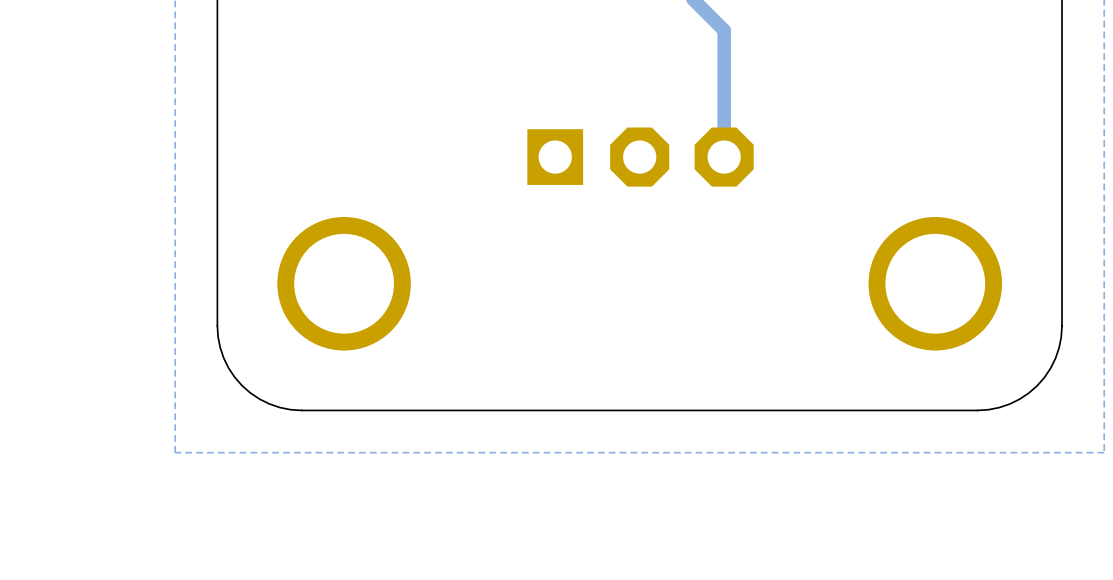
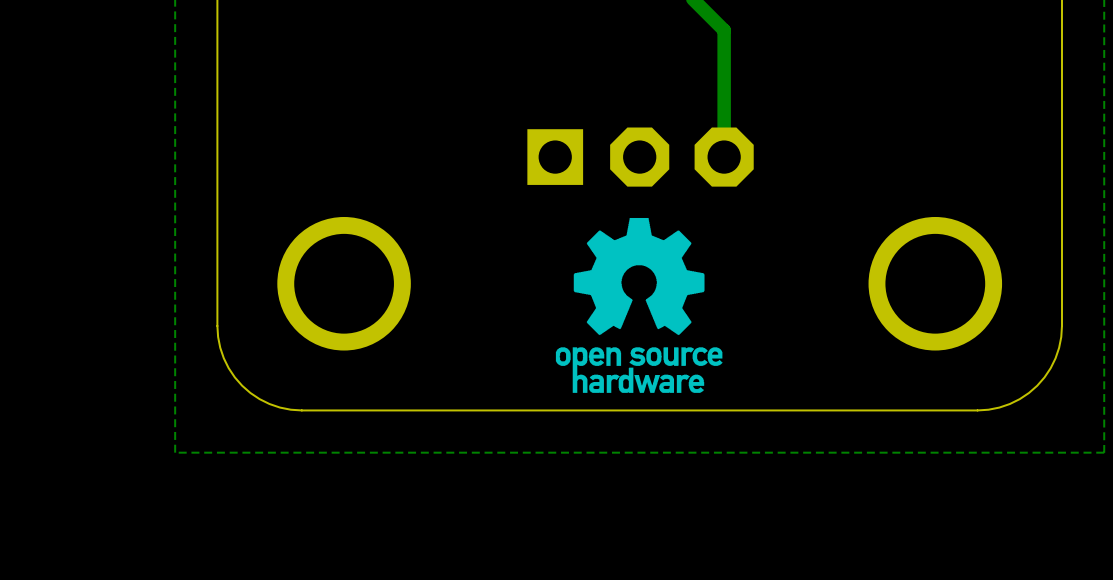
drawing: none -> [555, 217, 723, 393]

